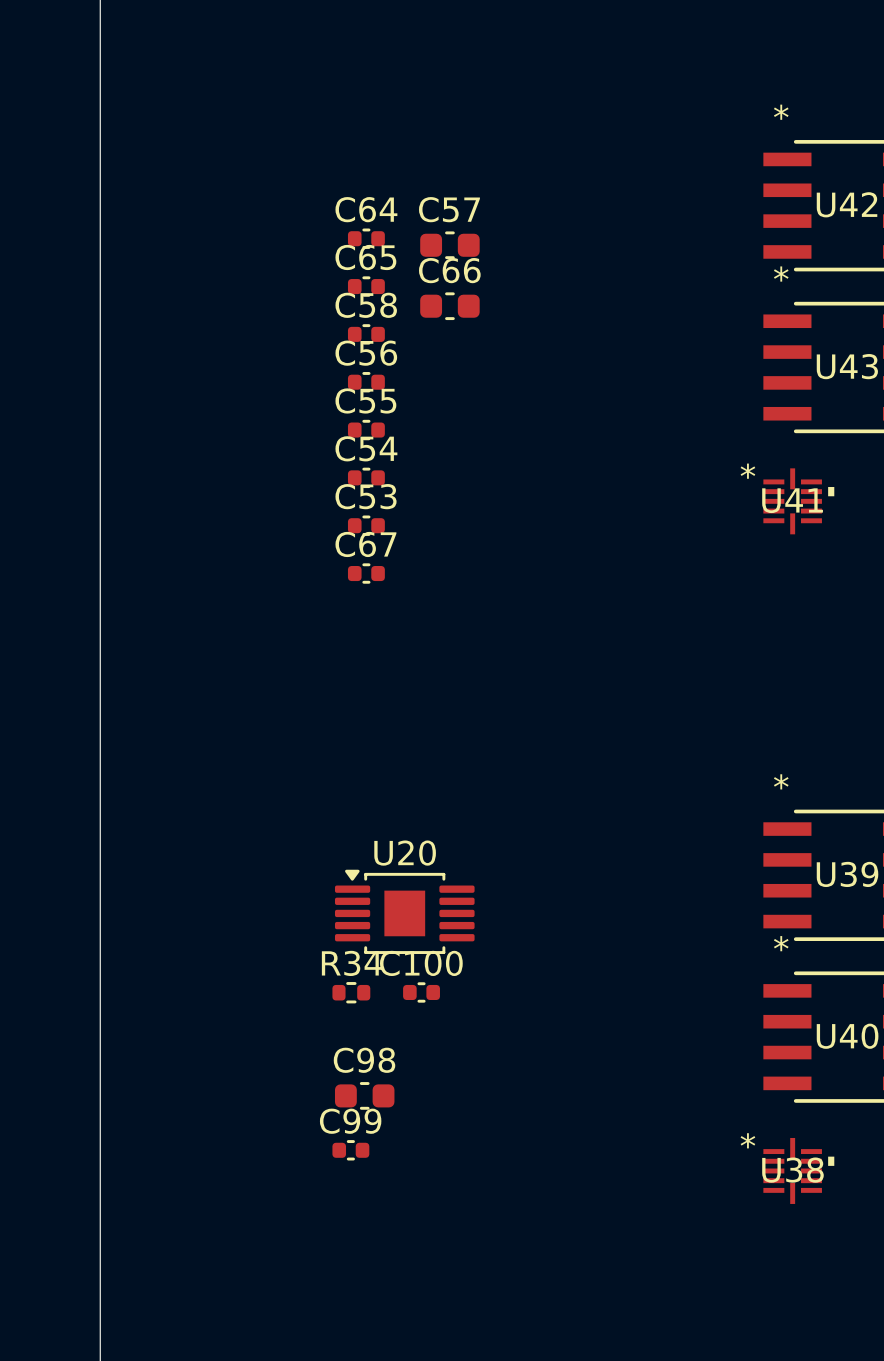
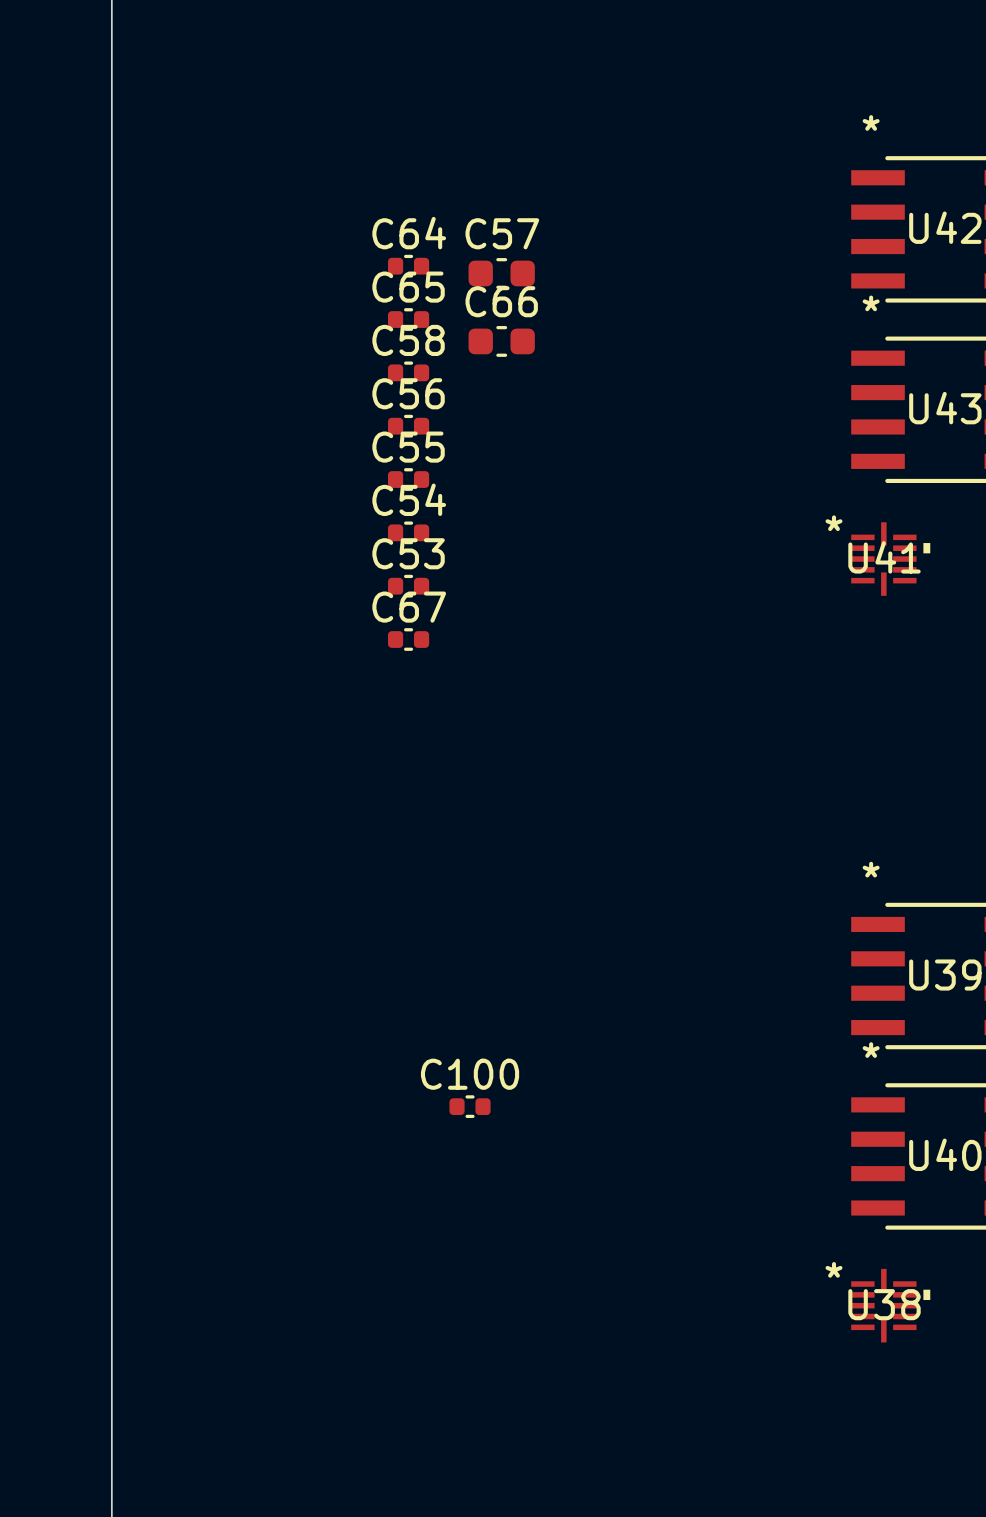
U20: (404, 911) -> none
R34: (351, 992) -> none
C98: (364, 1095) -> none
C99: (350, 1150) -> none

